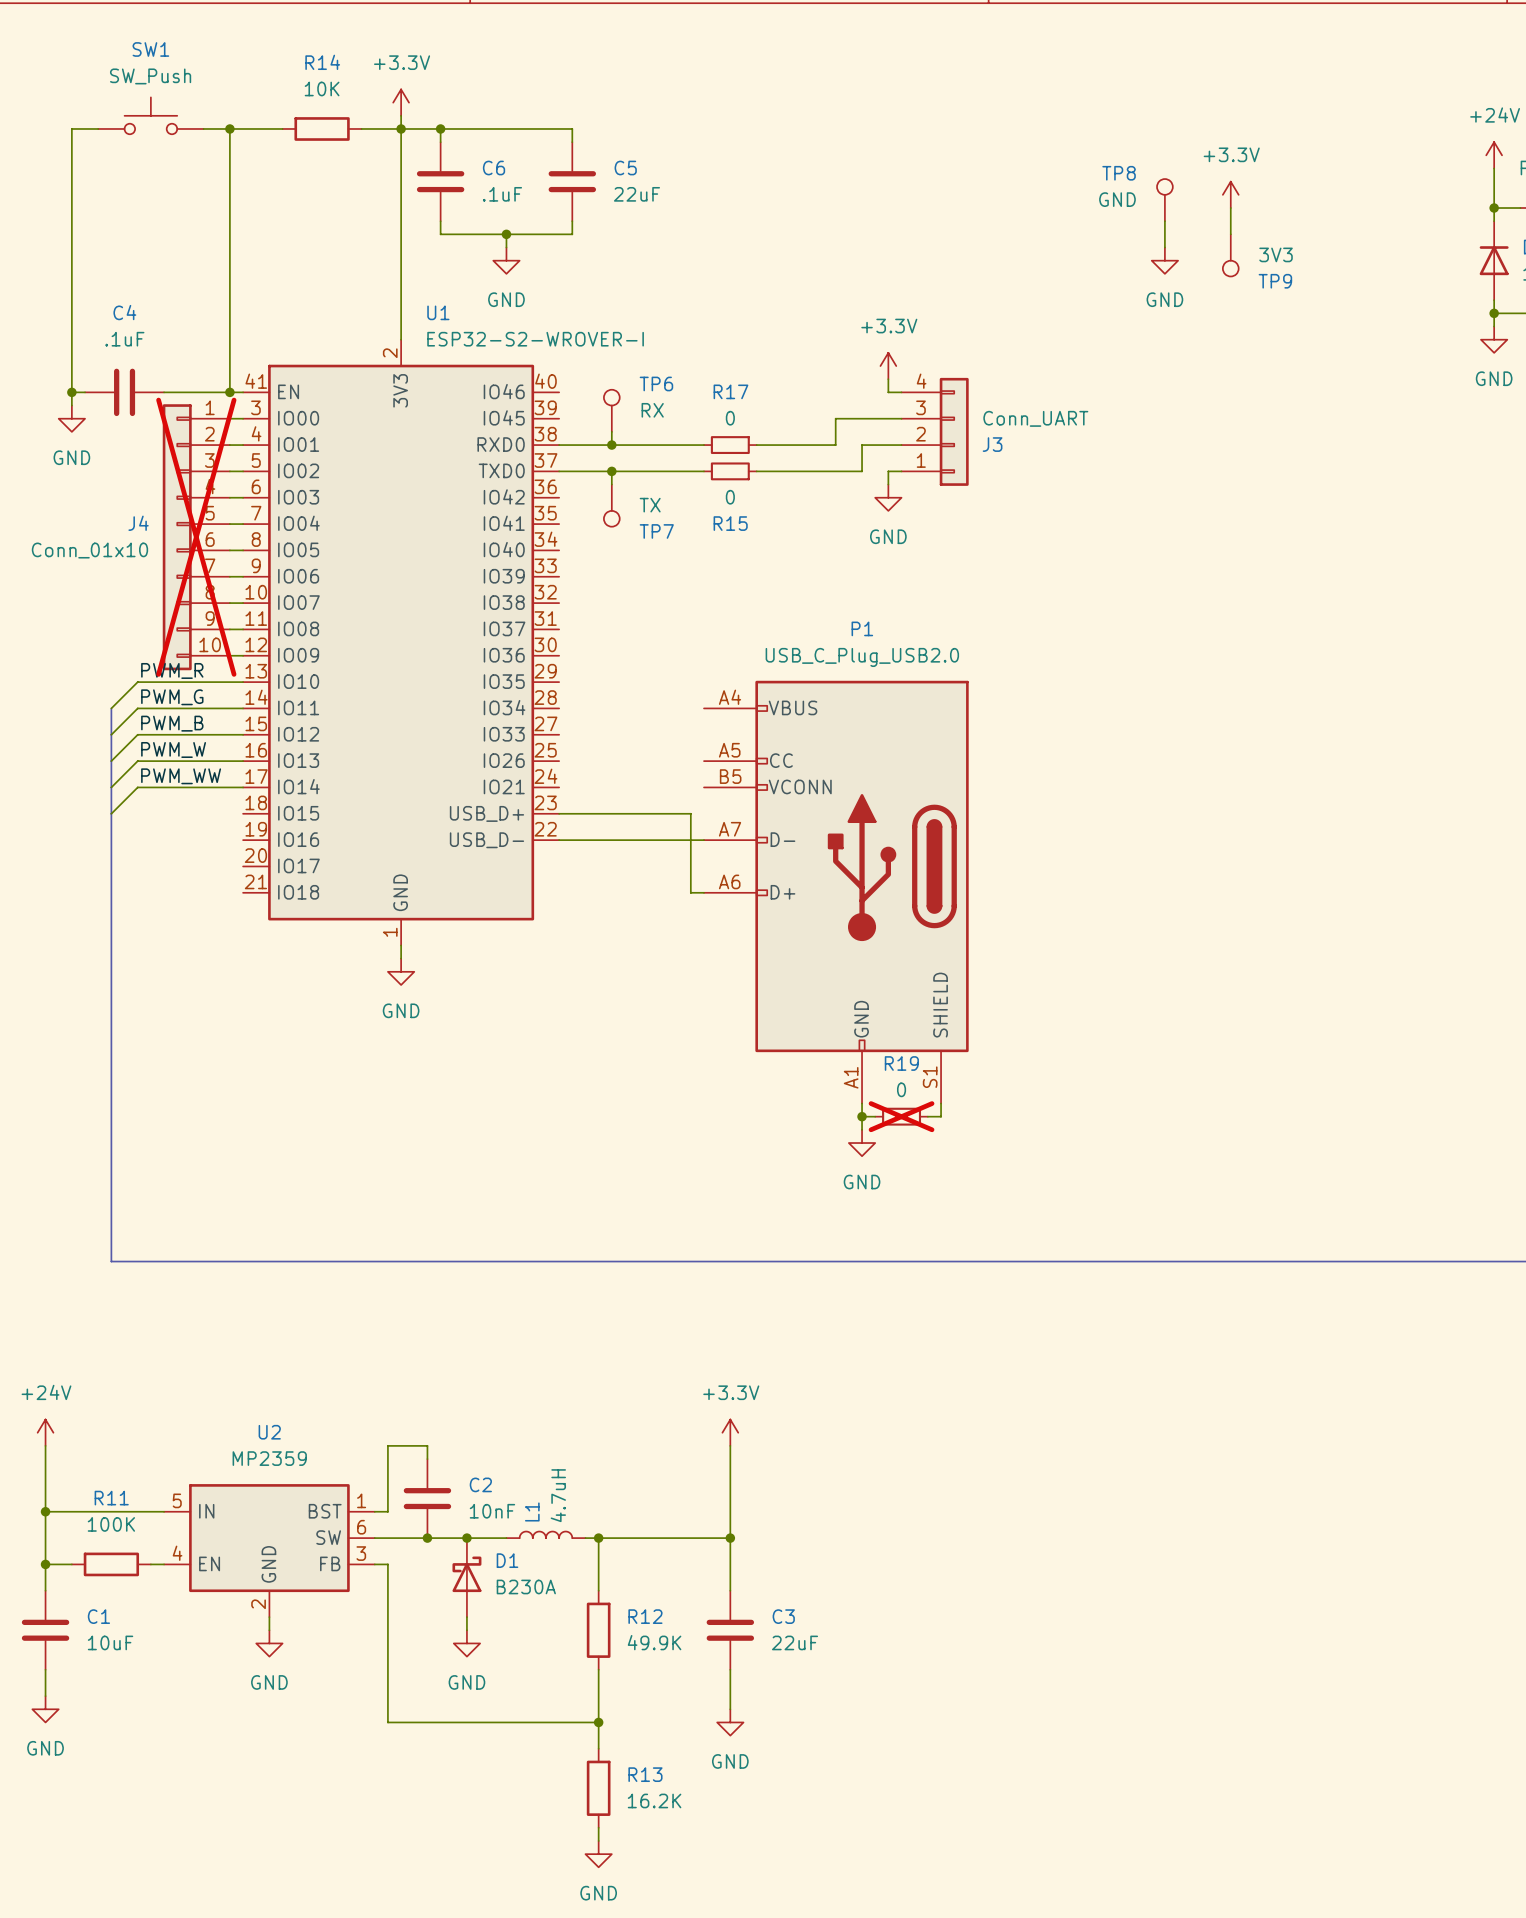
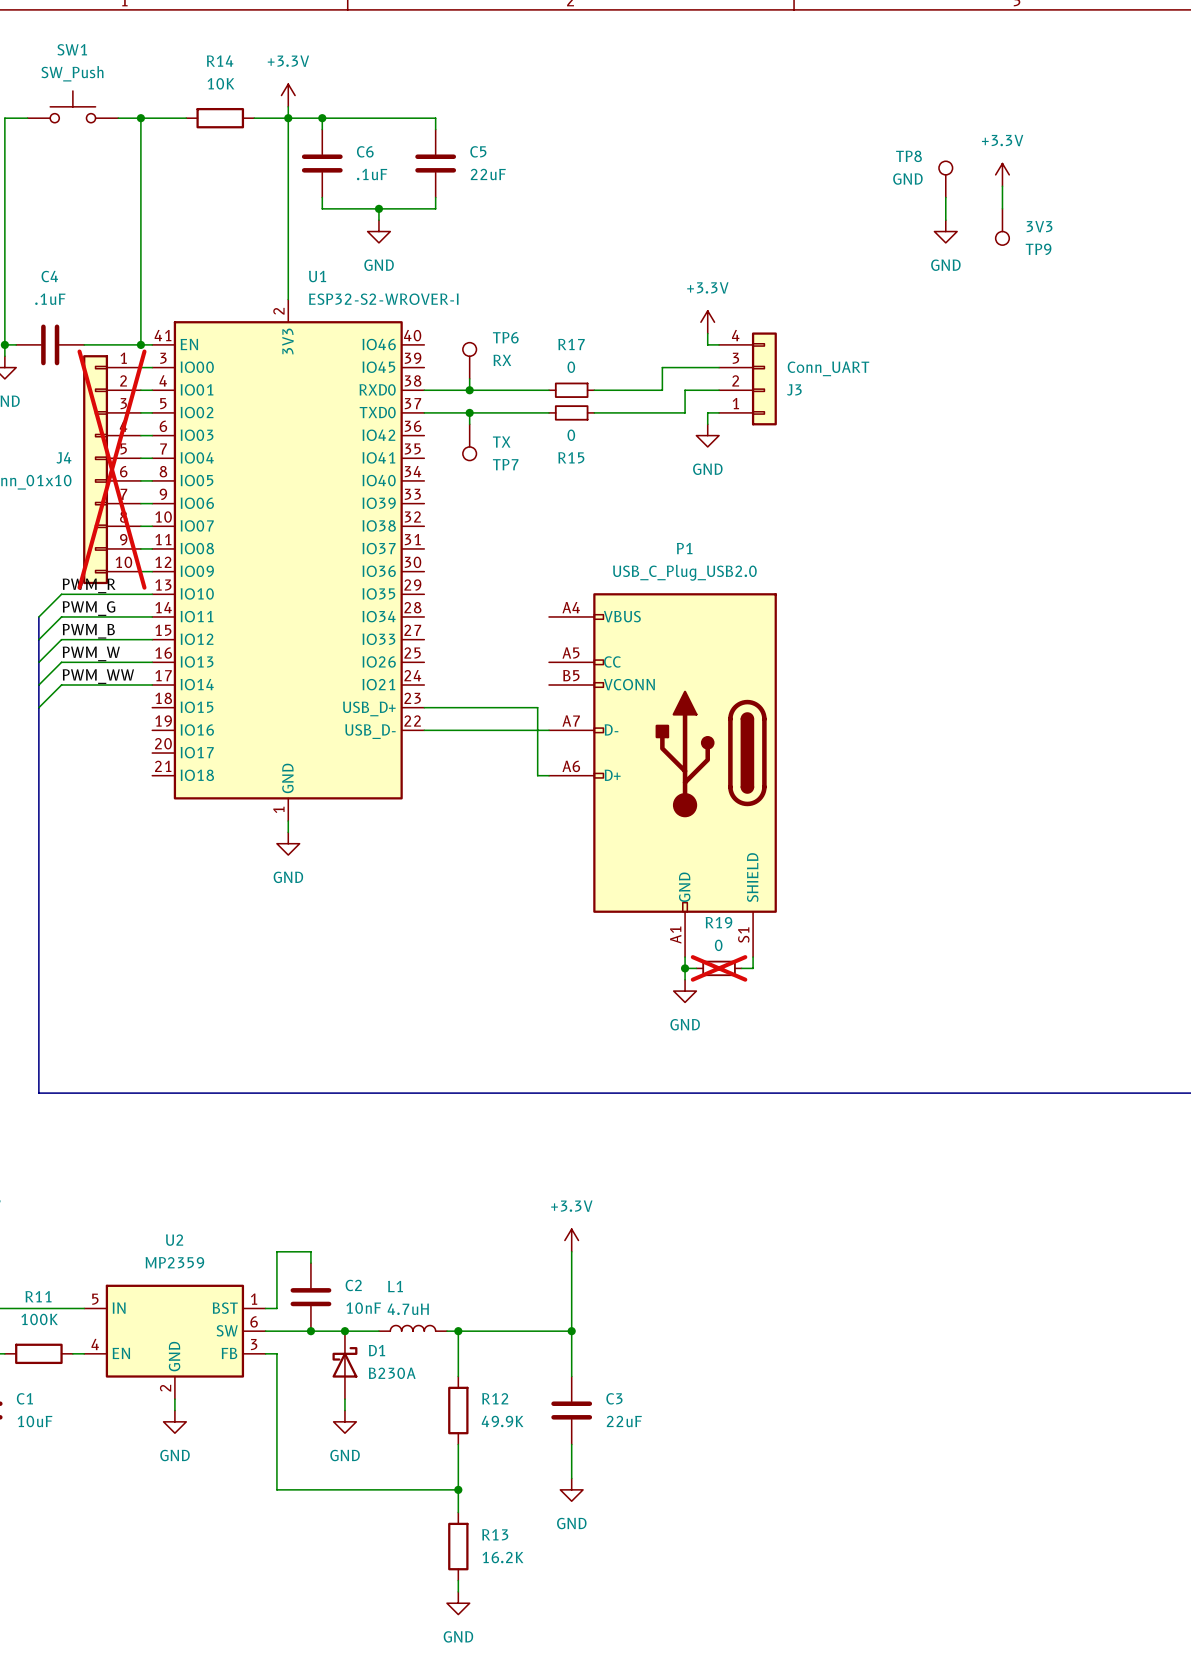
L1 value rotation: 0° (558, 1495) -> 90° clockwise (408, 1309)
L1 name rotation: 0° (532, 1511) -> 90° clockwise (395, 1286)

